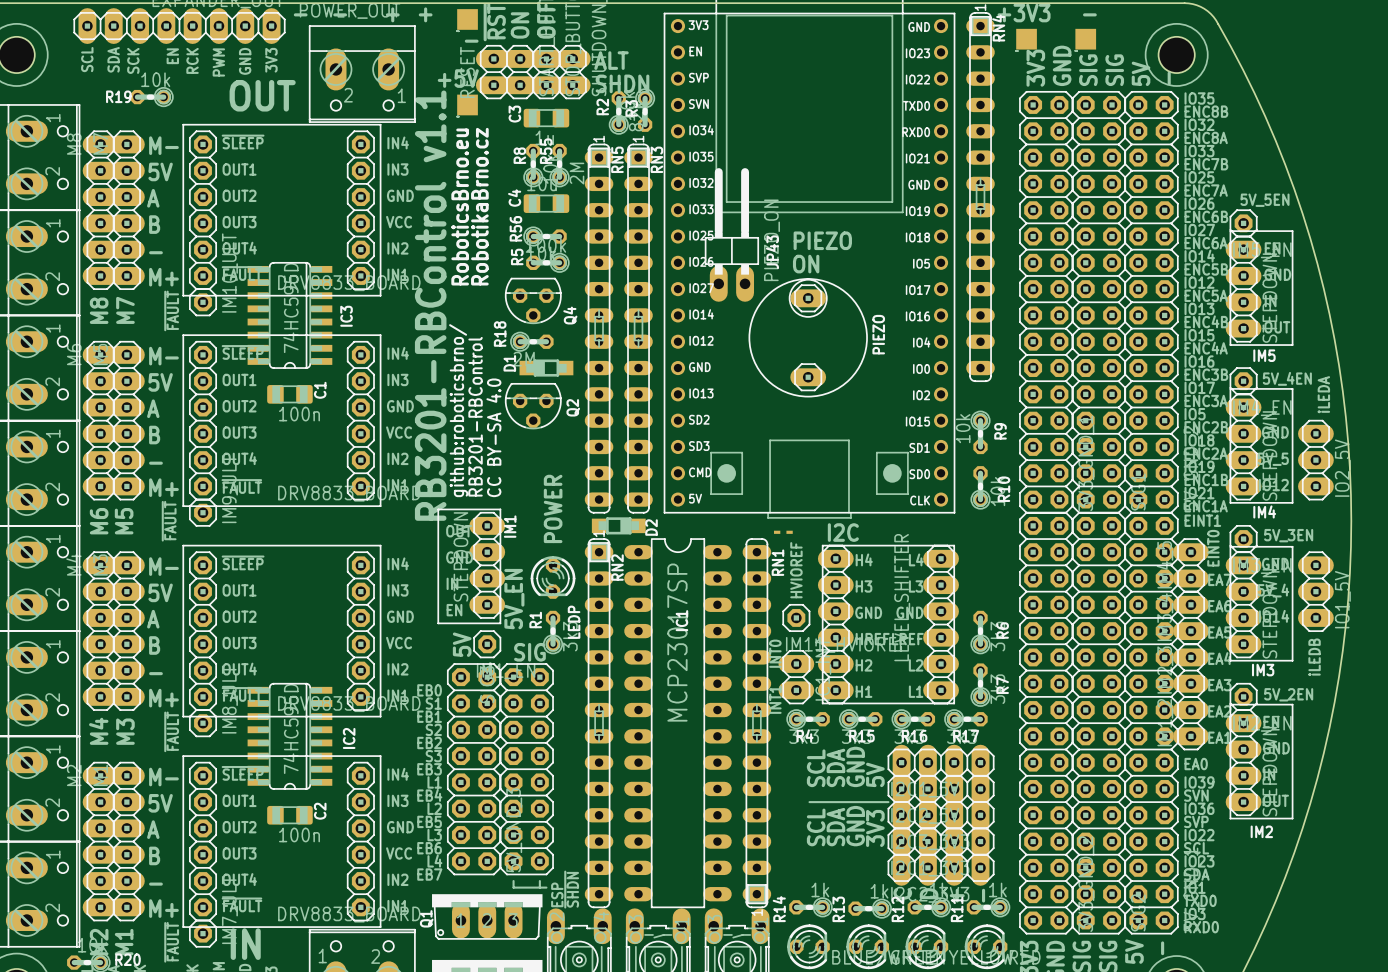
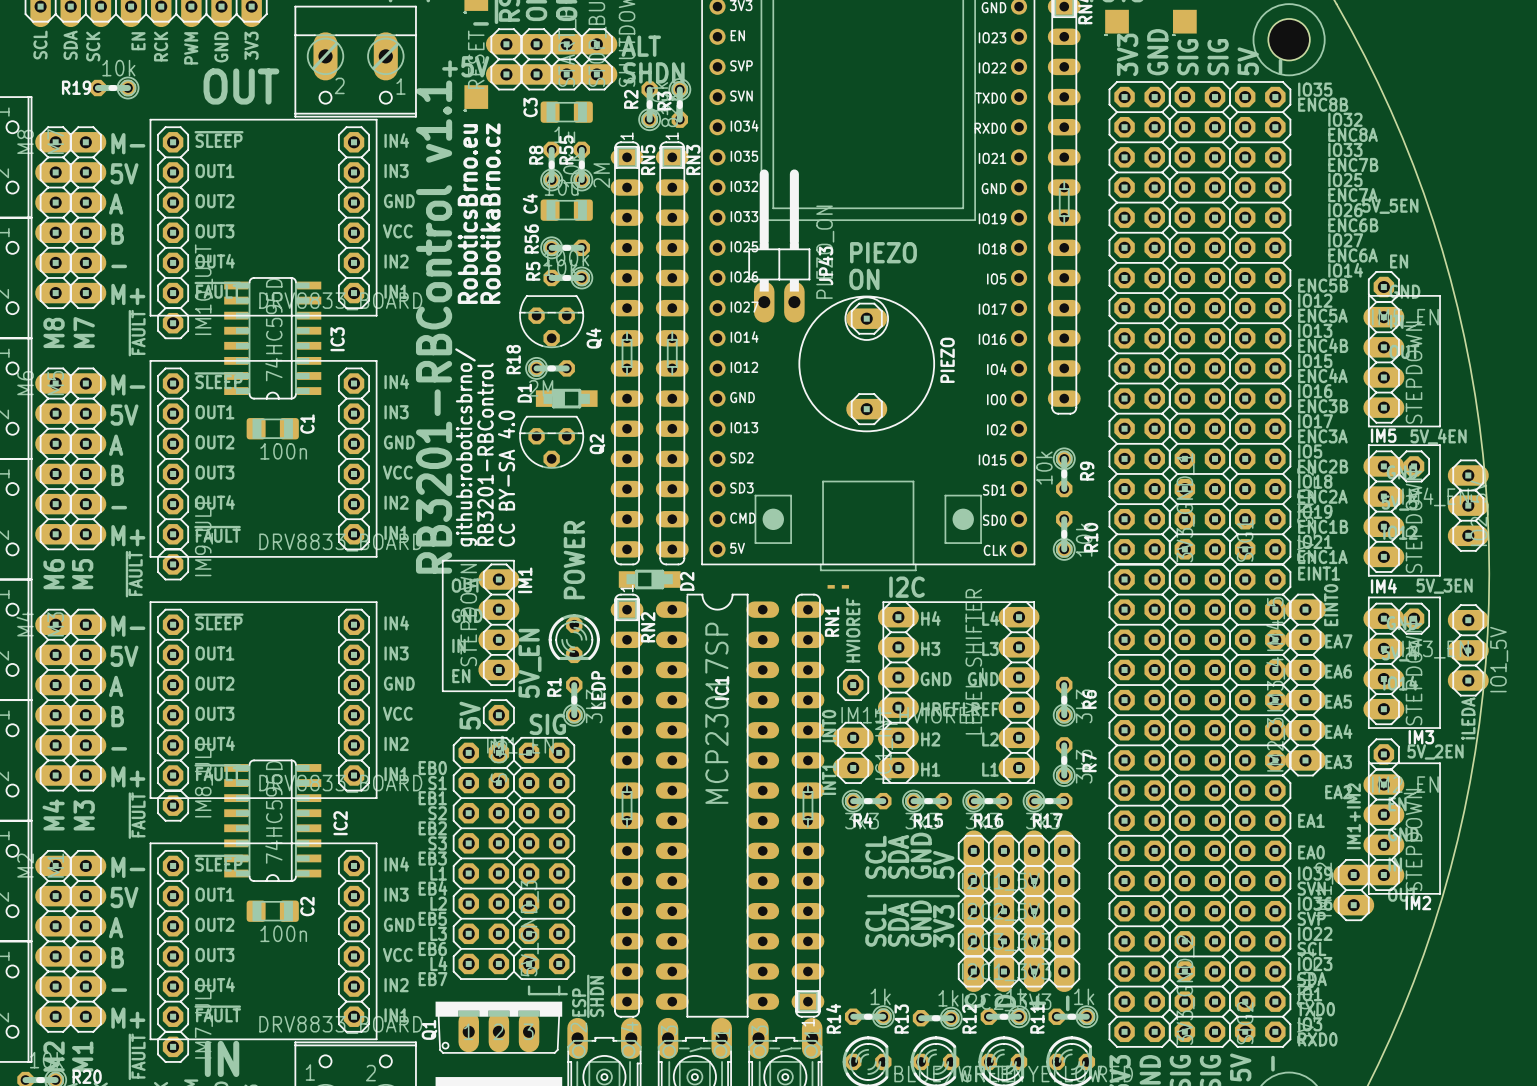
text position: IO32 (1199, 124) -> IO32 (1345, 119)
text position: ENC8A (1206, 137) -> ENC8A (1353, 134)
text position: IO33 (1199, 151) -> IO33 (1345, 149)
text position: ENC7B (1206, 164) -> ENC7B (1353, 165)
text position: IO25 (1199, 177) -> IO25 (1345, 180)
text position: ENC7A (1206, 190) -> ENC7A (1353, 195)
text position: IO26 (1199, 203) -> IO26 (1345, 210)
text position: ENC6B (1206, 216) -> ENC6B (1353, 225)
part position: (1243, 223) -> (1383, 287)
text position: IO27 (1199, 230) -> IO27 (1345, 240)
text position: ENC6A (1206, 243) -> ENC6A (1353, 255)
text position: IO14 (1199, 256) -> IO14 (1345, 270)
IM5 position: (1259, 288) -> (1402, 361)
IM5 name position: IM5 (1264, 355) -> IM5 (1383, 435)
text position: 5V_4EN (1287, 378) -> 5V_4EN (1438, 436)
part position: (1243, 381) -> (1414, 466)
text position: iLEDA (1323, 394) -> iLEDA (1468, 718)
IM4 position: (1259, 445) -> (1402, 510)
part position: (1315, 460) -> (1468, 505)
IM4 name position: IM4 (1264, 511) -> IM4 (1383, 586)
text position: 5V_3EN (1288, 535) -> 5V_3EN (1444, 586)
part position: (1243, 539) -> (1414, 618)
part position: (1315, 591) -> (1468, 650)
IM3 position: (1259, 603) -> (1402, 662)
text: iLEDB (1314, 657) -> none
IM3 name position: IM3 (1263, 670) -> IM3 (1421, 737)
text position: 5V_2EN (1288, 694) -> 5V_2EN (1435, 752)
part position: (1243, 696) -> (1383, 754)
part position: (1190, 723) -> (1353, 890)
text: none -> IM1+IM2 (1353, 816)
text position: EA1 (1219, 737) -> EA1 (1311, 820)
IM2 position: (1259, 761) -> (1402, 828)
IM2 name position: IM2 (1261, 831) -> IM2 (1418, 903)

